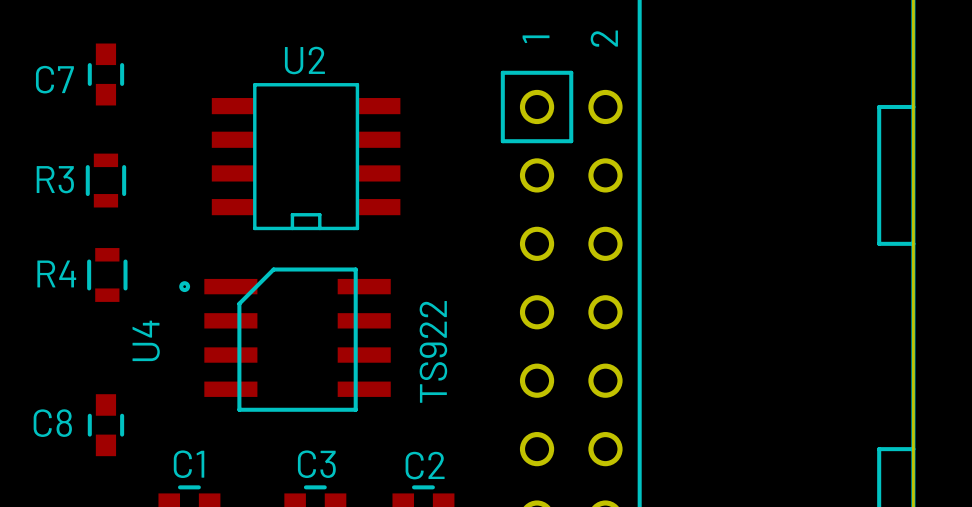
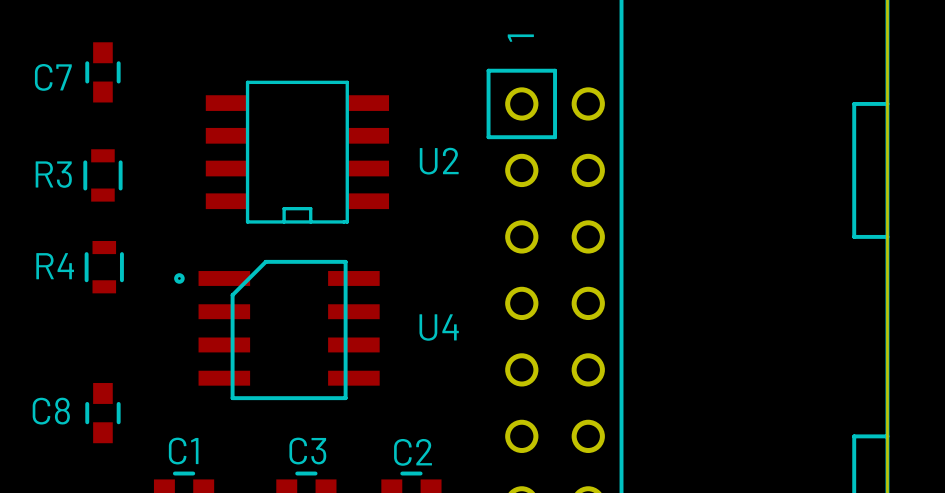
part text: 2 (604, 38) -> none
U2 name position: U2 (304, 60) -> U2 (439, 161)
U4 name rotation: 0° (146, 340) -> 90° clockwise (439, 327)
U4 name position: U4 (146, 340) -> U4 (439, 327)
U4 value: TS922 (433, 351) -> none

